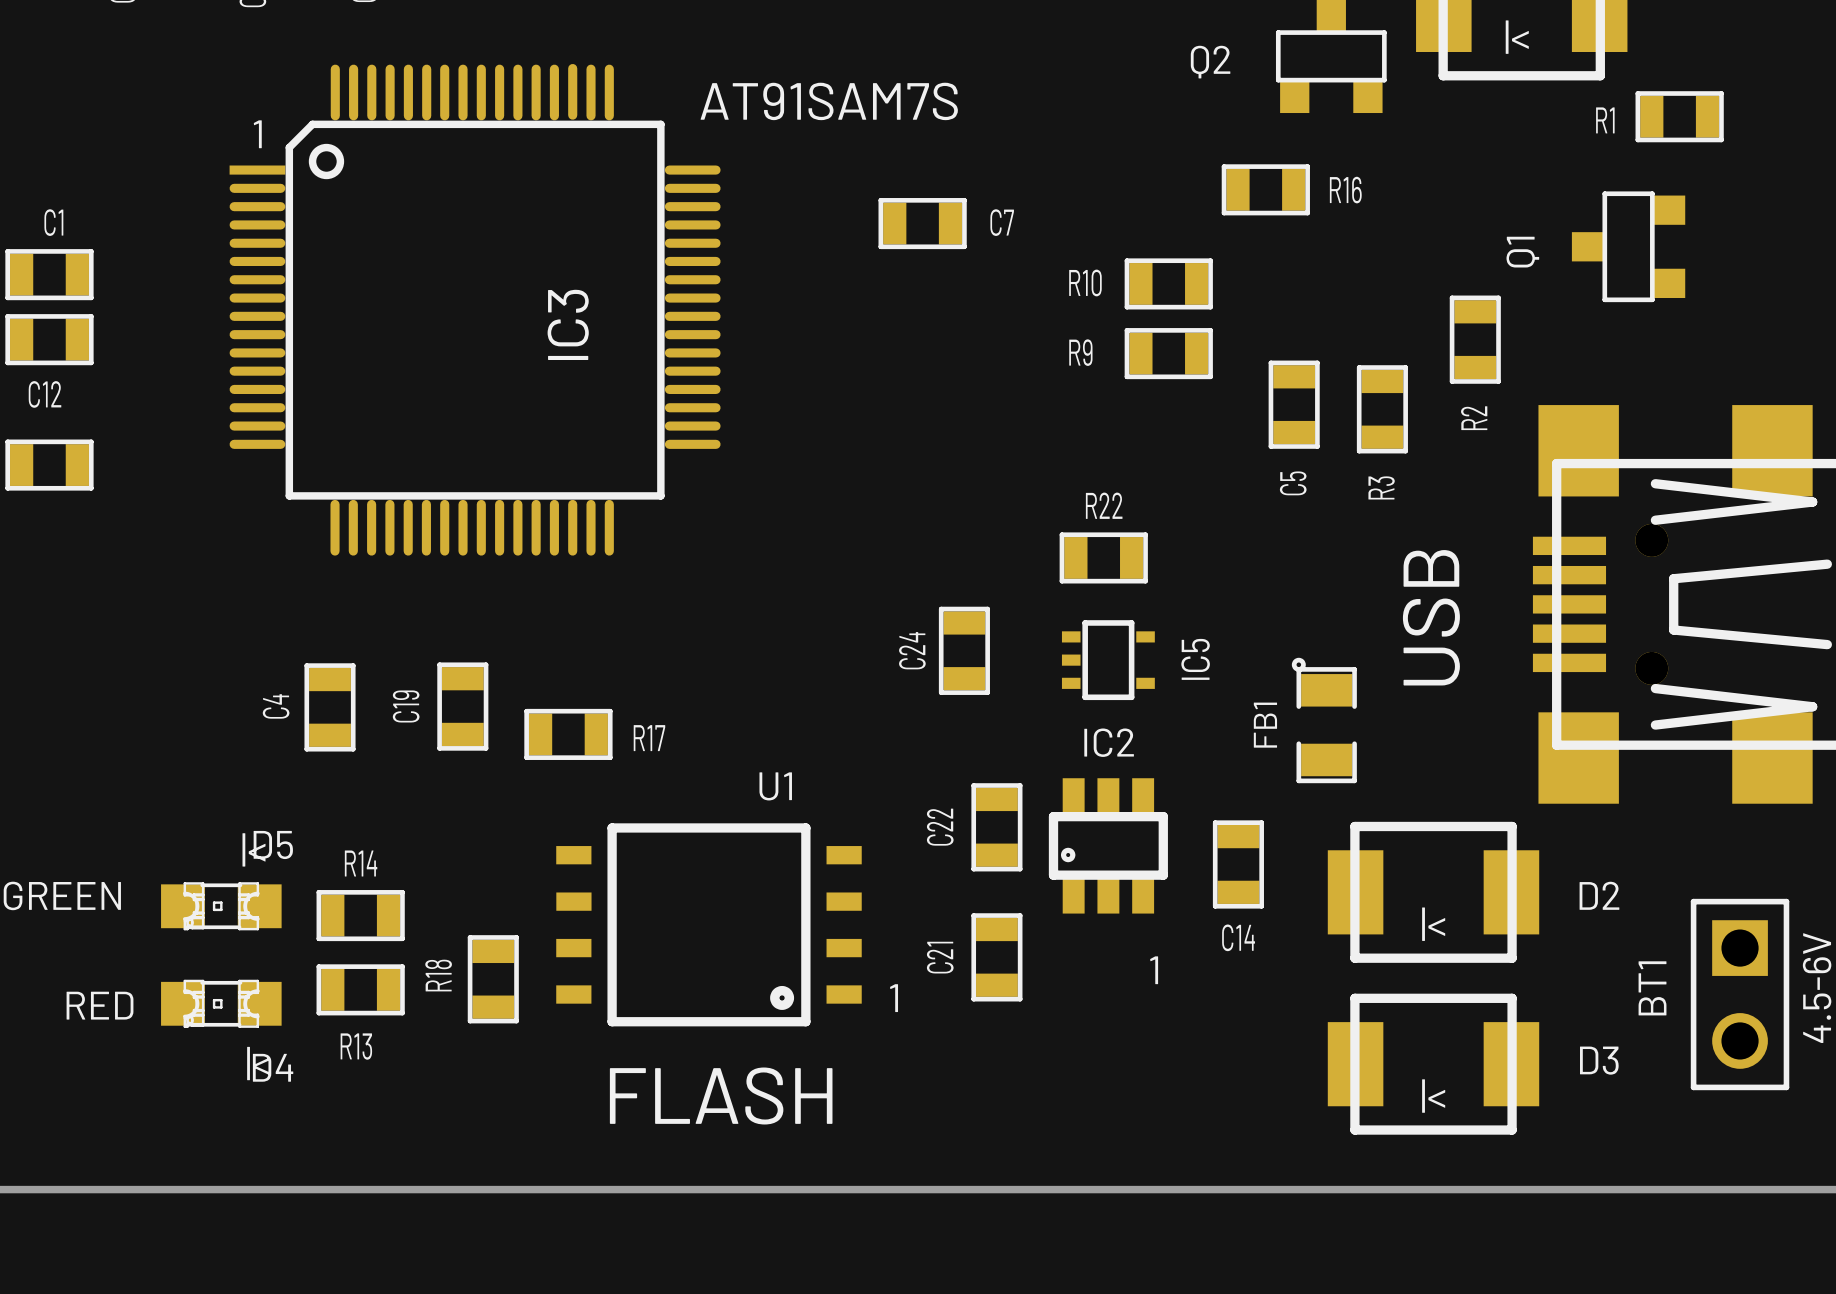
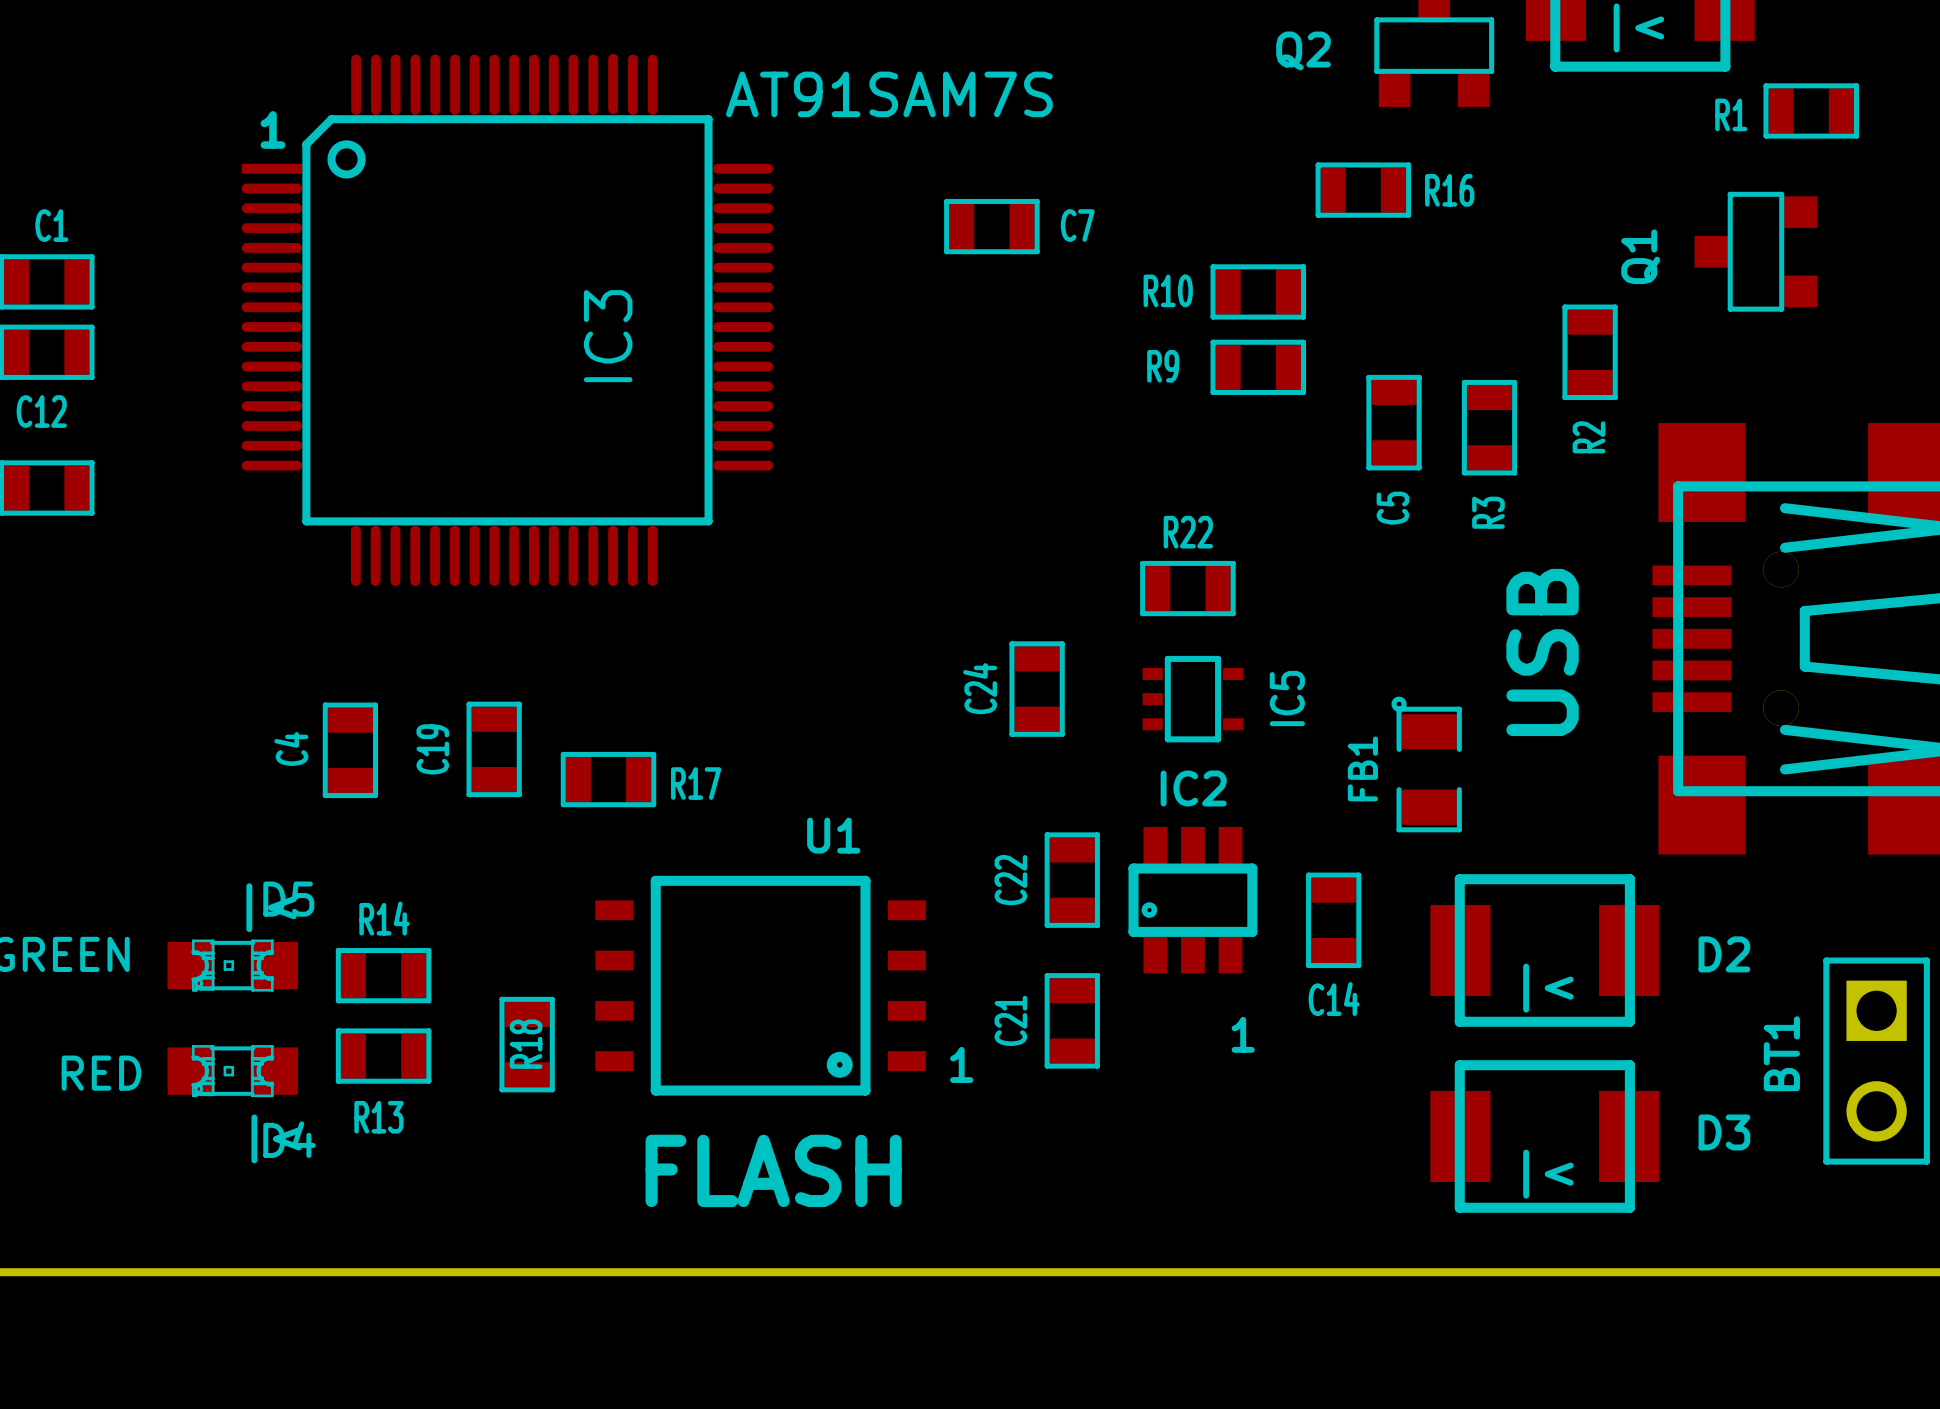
R18 name position: R18 (438, 975) -> R18 (526, 1044)

